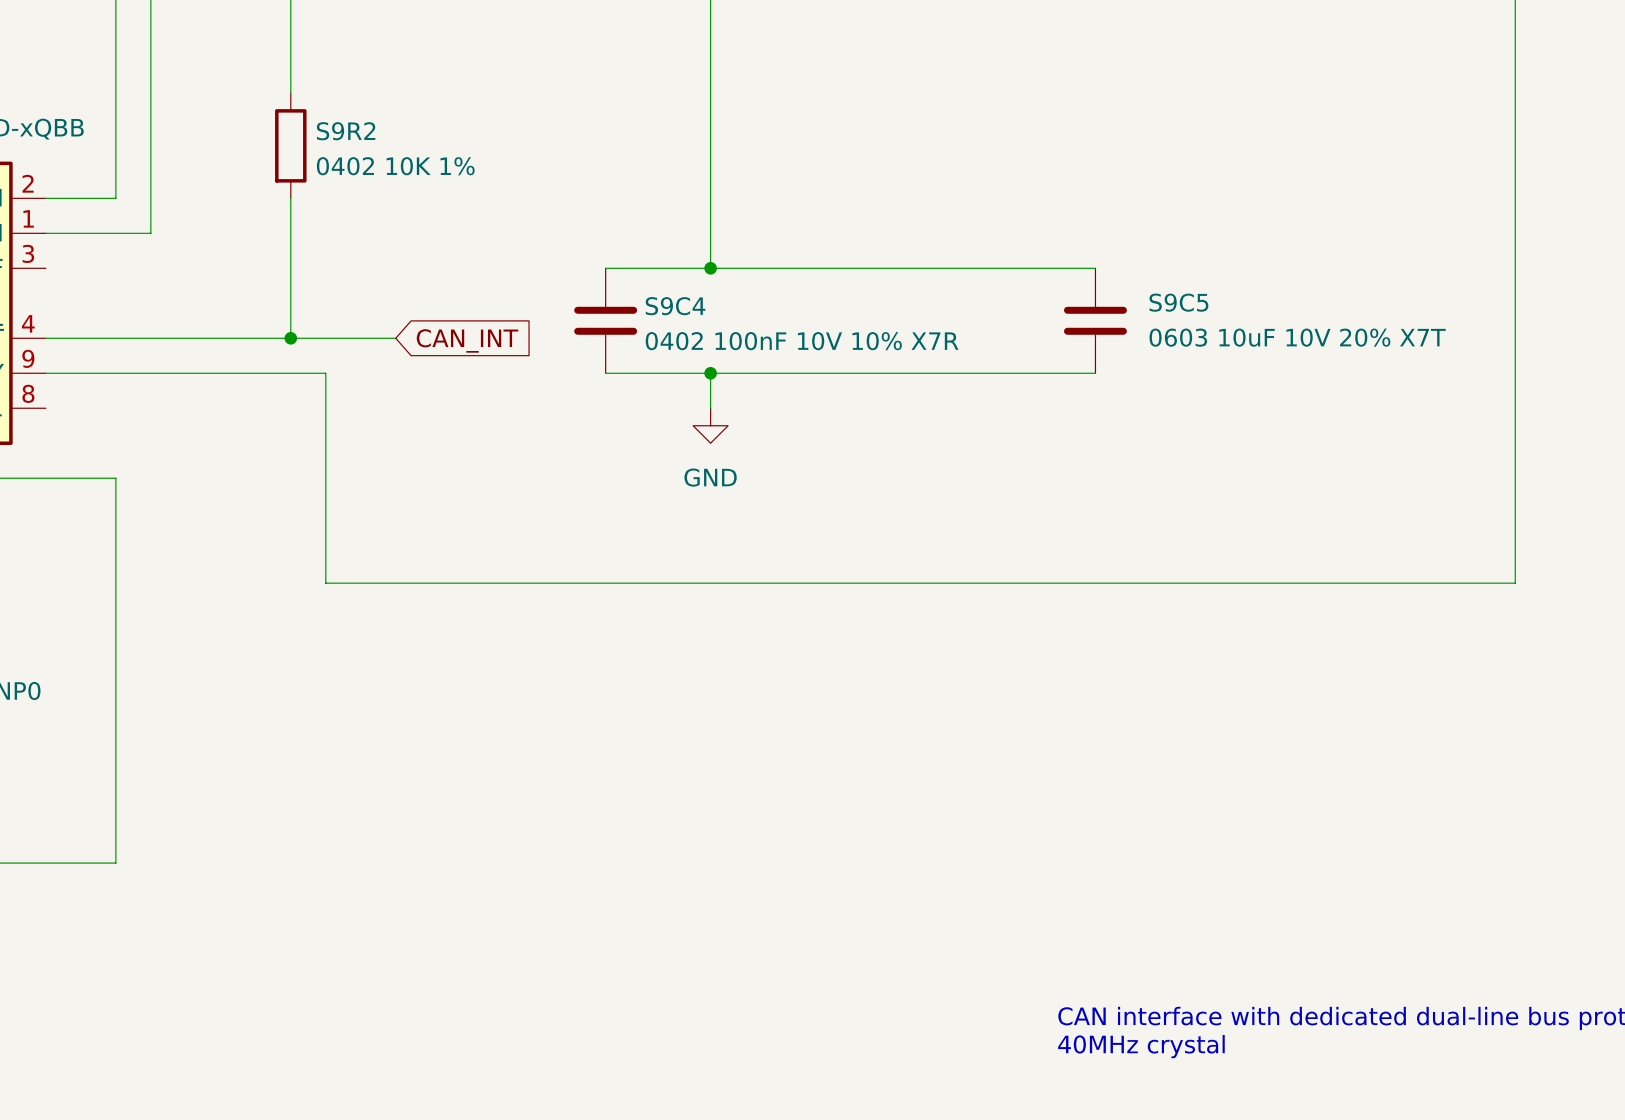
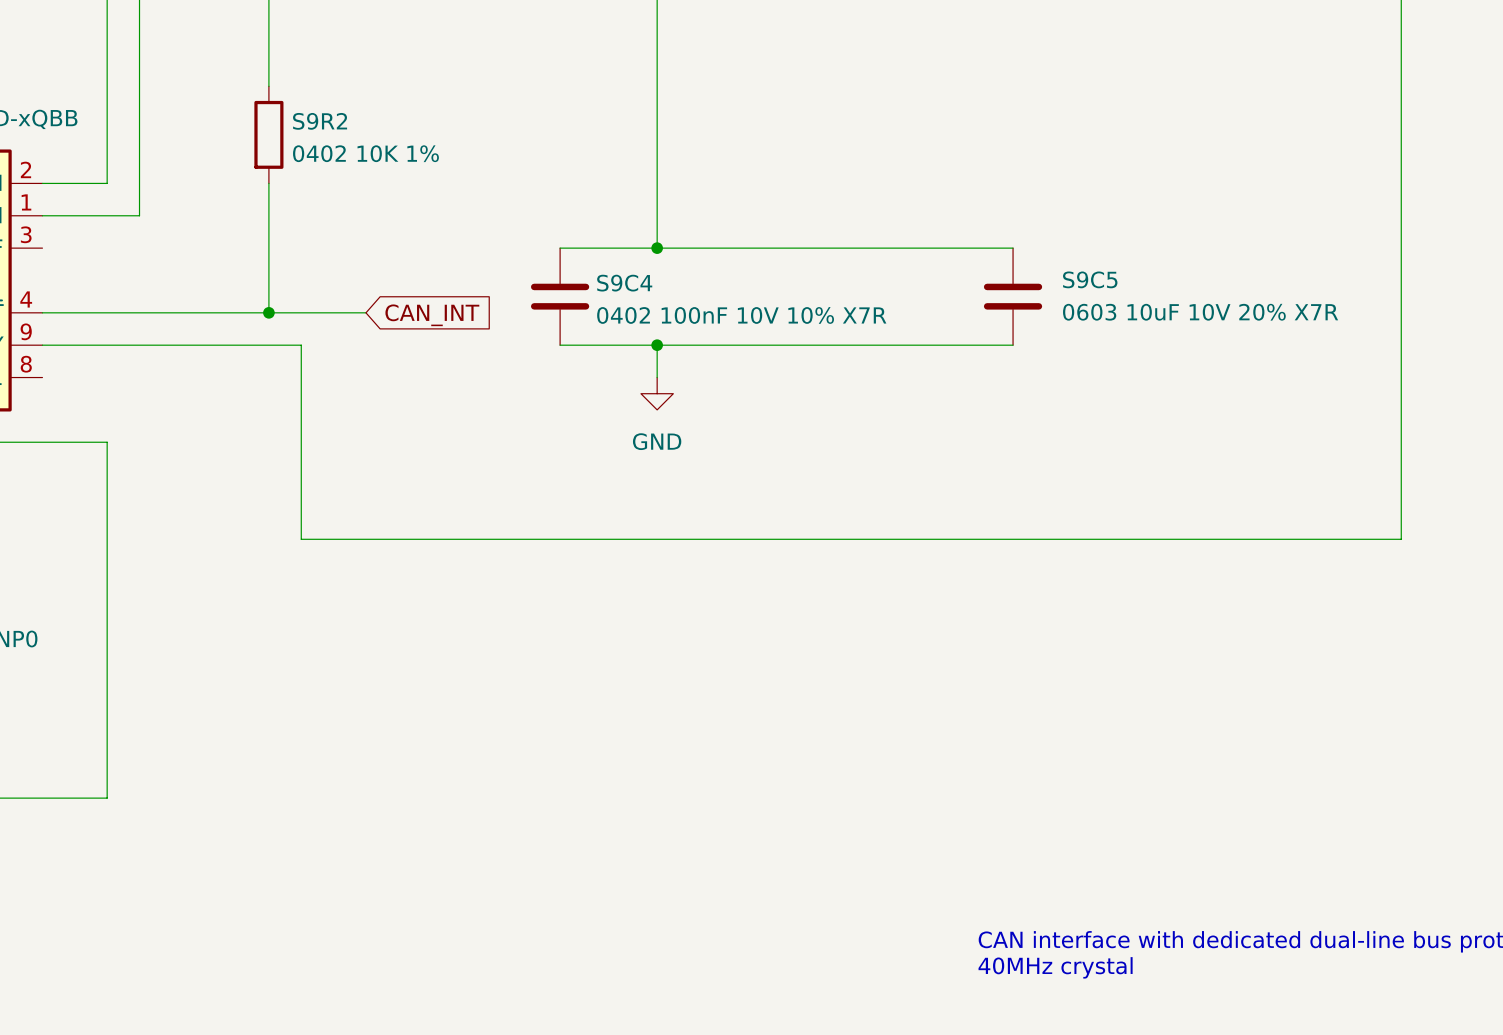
S9C5 value: 0603 10uF 10V 20% X7T (1297, 337) -> 0603 10uF 10V 20% X7R (1200, 312)

